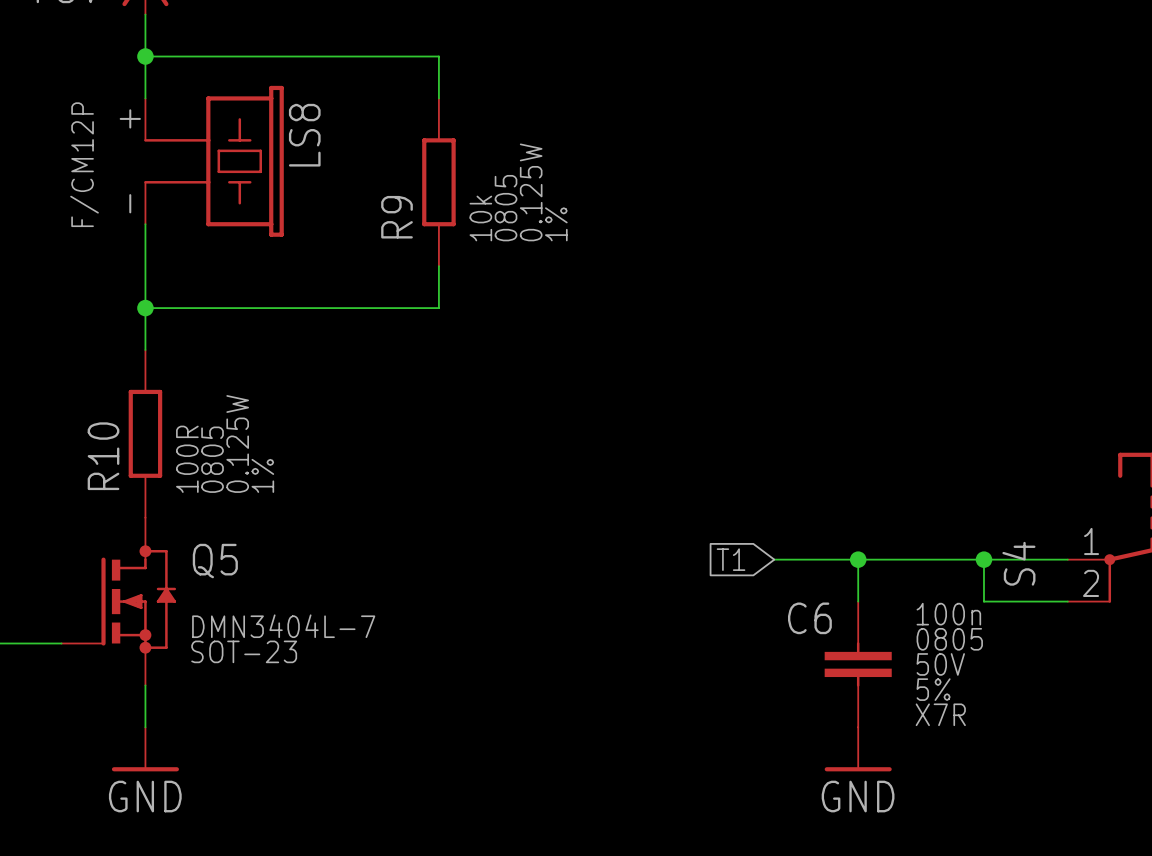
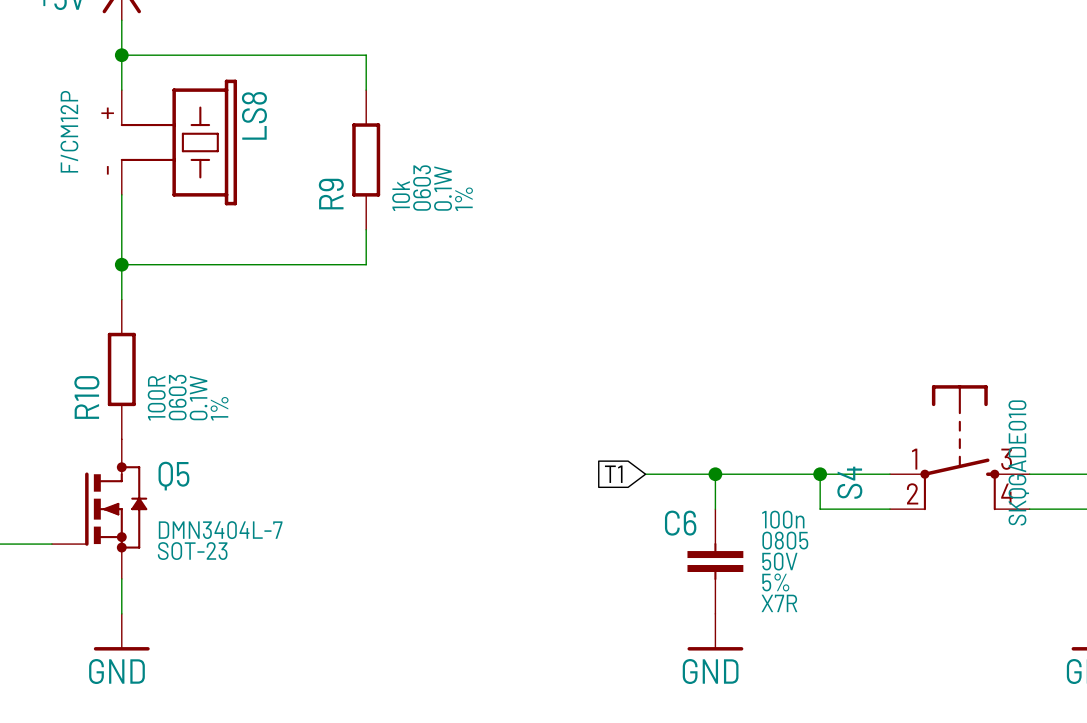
R9 text: 0.125W (531, 192) -> 0.1W (443, 188)
R9 text: 0805 (506, 208) -> 0603 (422, 188)
R10 text: 0.125W (237, 443) -> 0.1W (198, 398)
R10 text: 0805 (212, 459) -> 0603 (177, 397)

